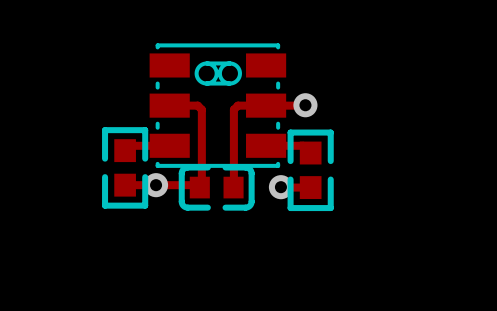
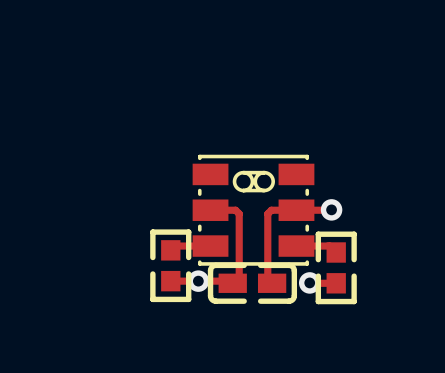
part footprint: [178, 164, 255, 211] -> [207, 262, 298, 304]

